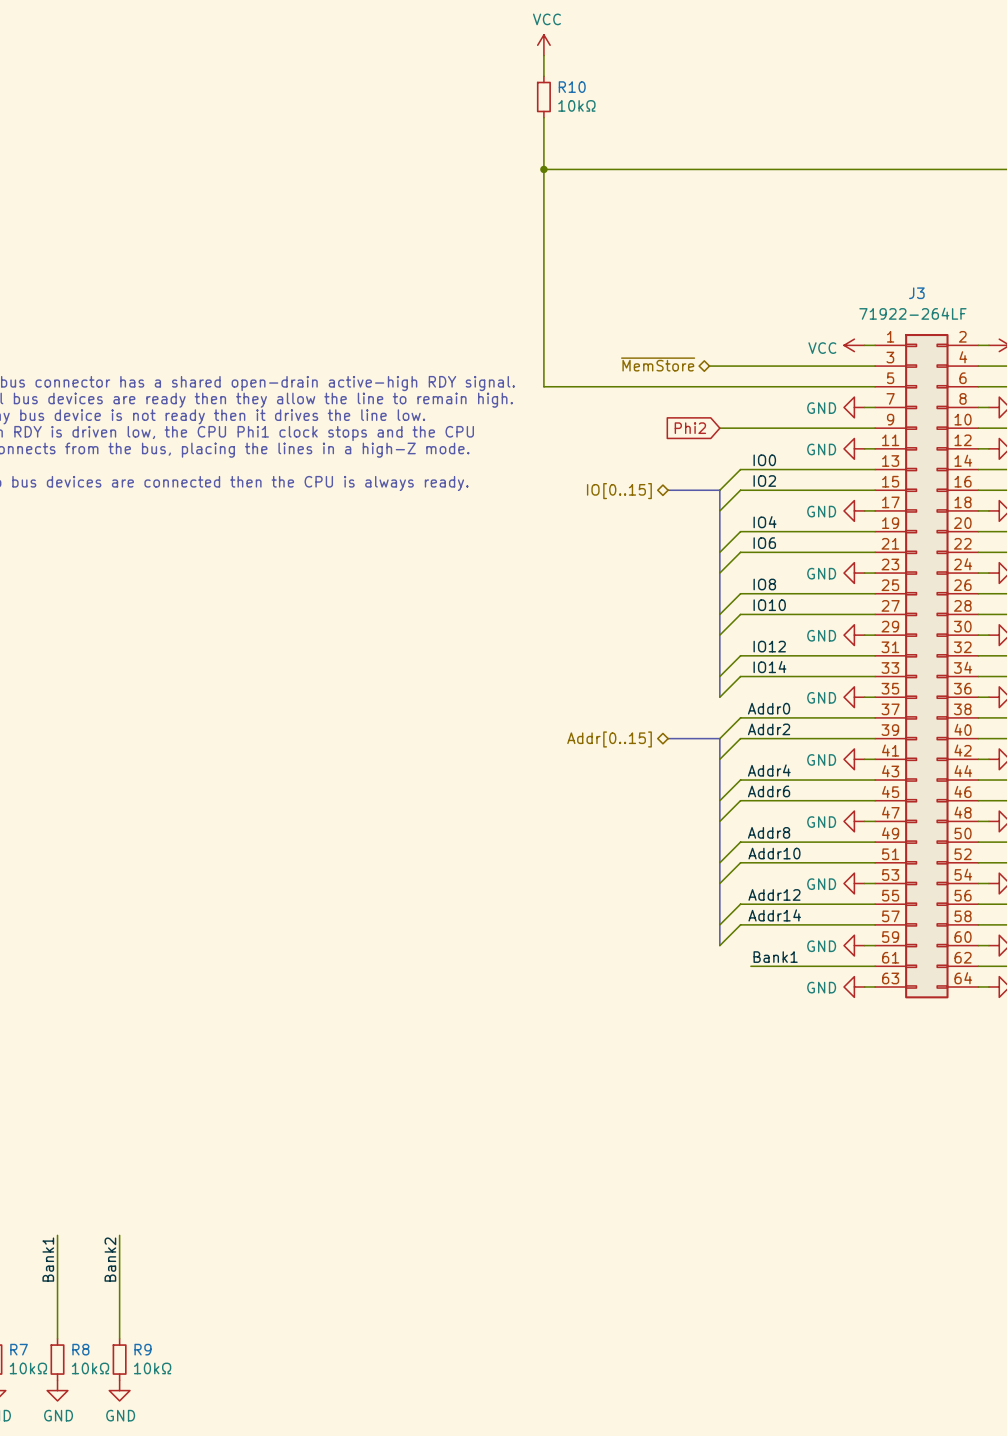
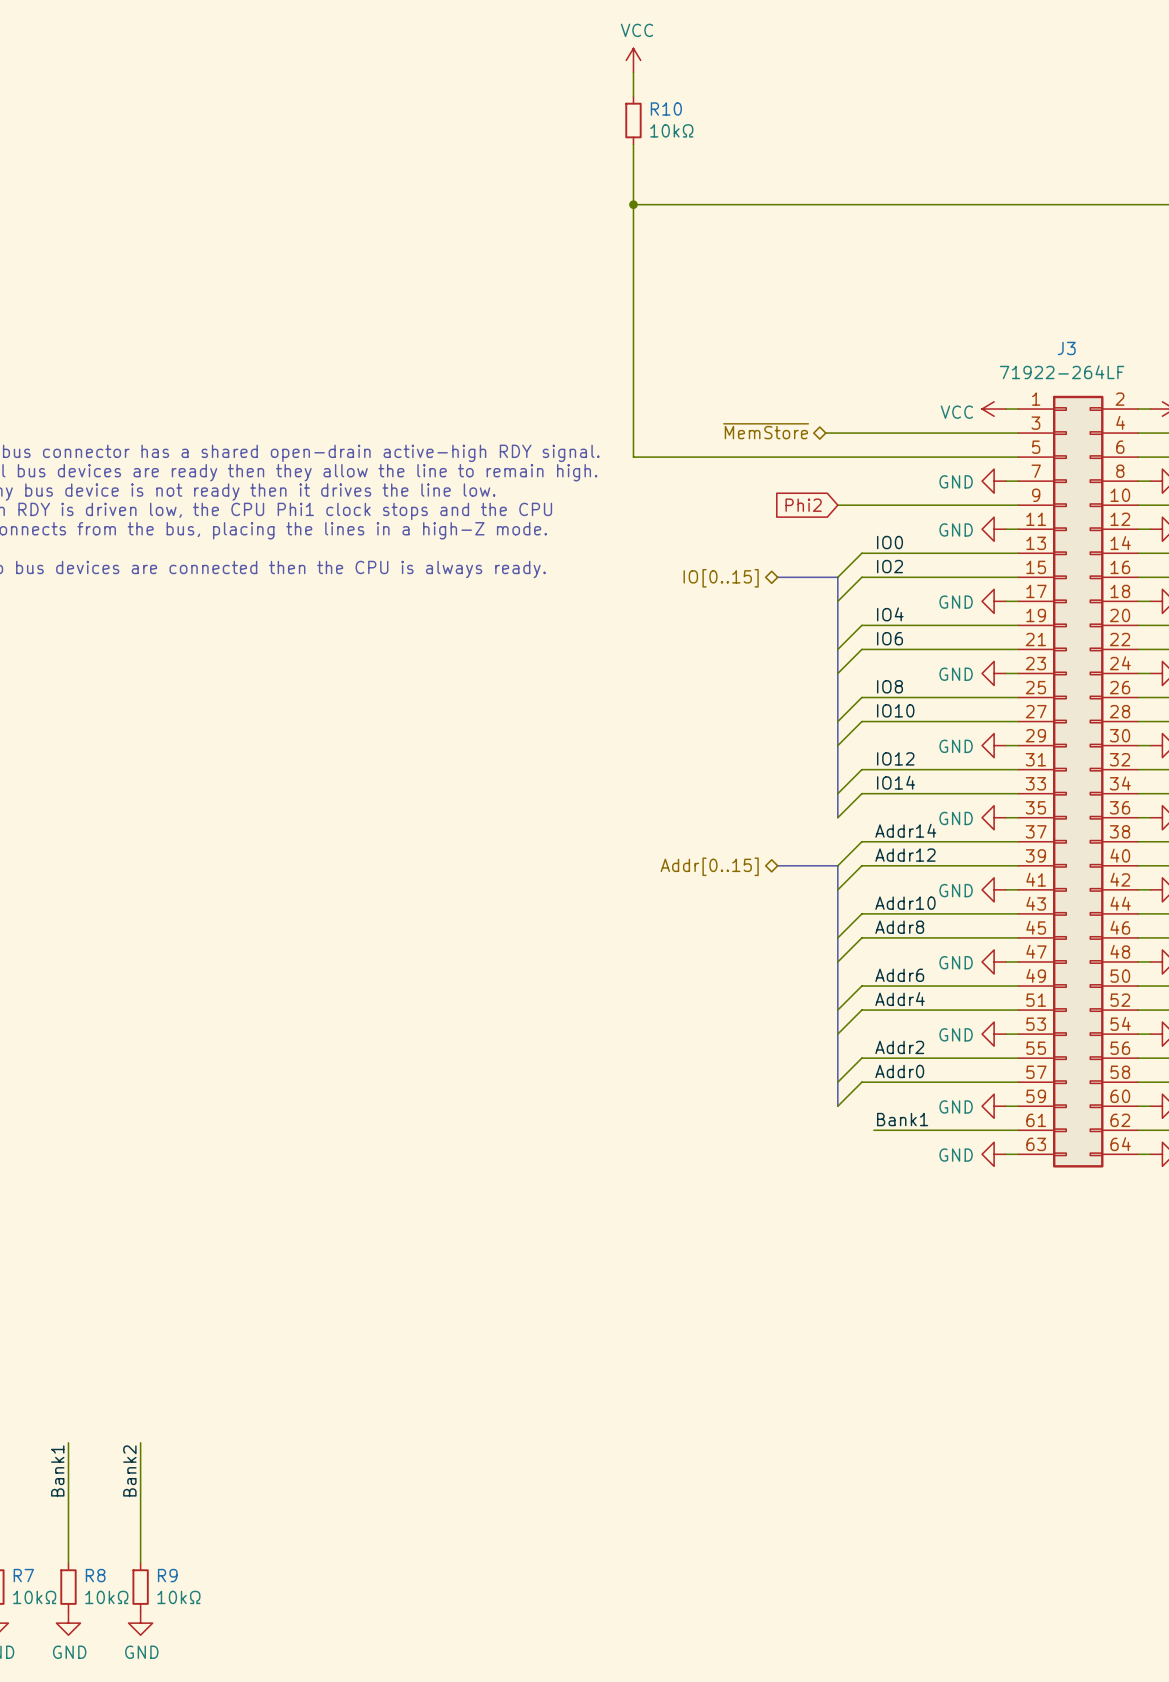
label: Addr0 (769, 708) -> Addr14 (905, 830)
label position: Addr2 (769, 729) -> Addr2 (899, 1047)
label position: Addr4 (769, 770) -> Addr4 (900, 999)
label position: Addr6 (769, 791) -> Addr6 (899, 975)
label position: Addr8 (769, 832) -> Addr8 (899, 927)
label position: Addr10 (774, 853) -> Addr10 (905, 903)
label position: Addr12 (774, 894) -> Addr12 (905, 855)
label: Addr14 (774, 915) -> Addr0 (899, 1071)

